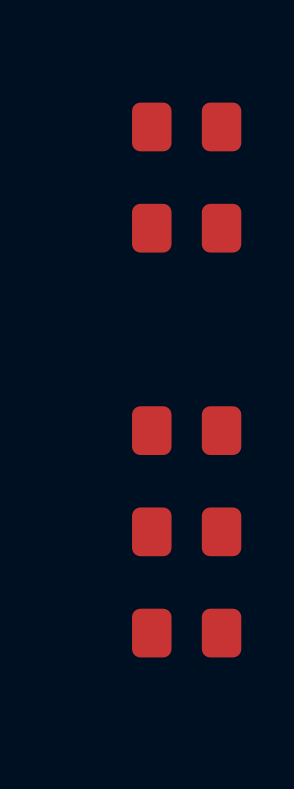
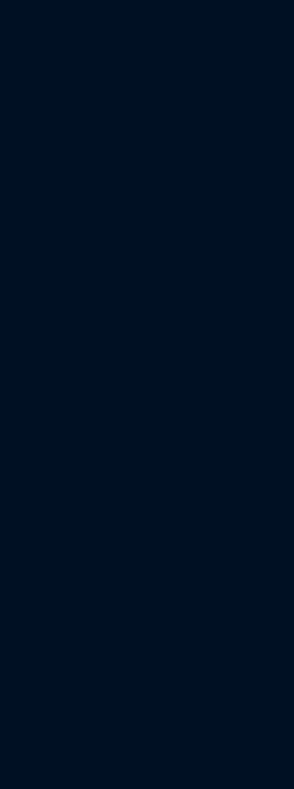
part: (186, 126) -> none
part: (186, 228) -> none
part: (186, 430) -> none
part: (186, 531) -> none
part: (186, 633) -> none

